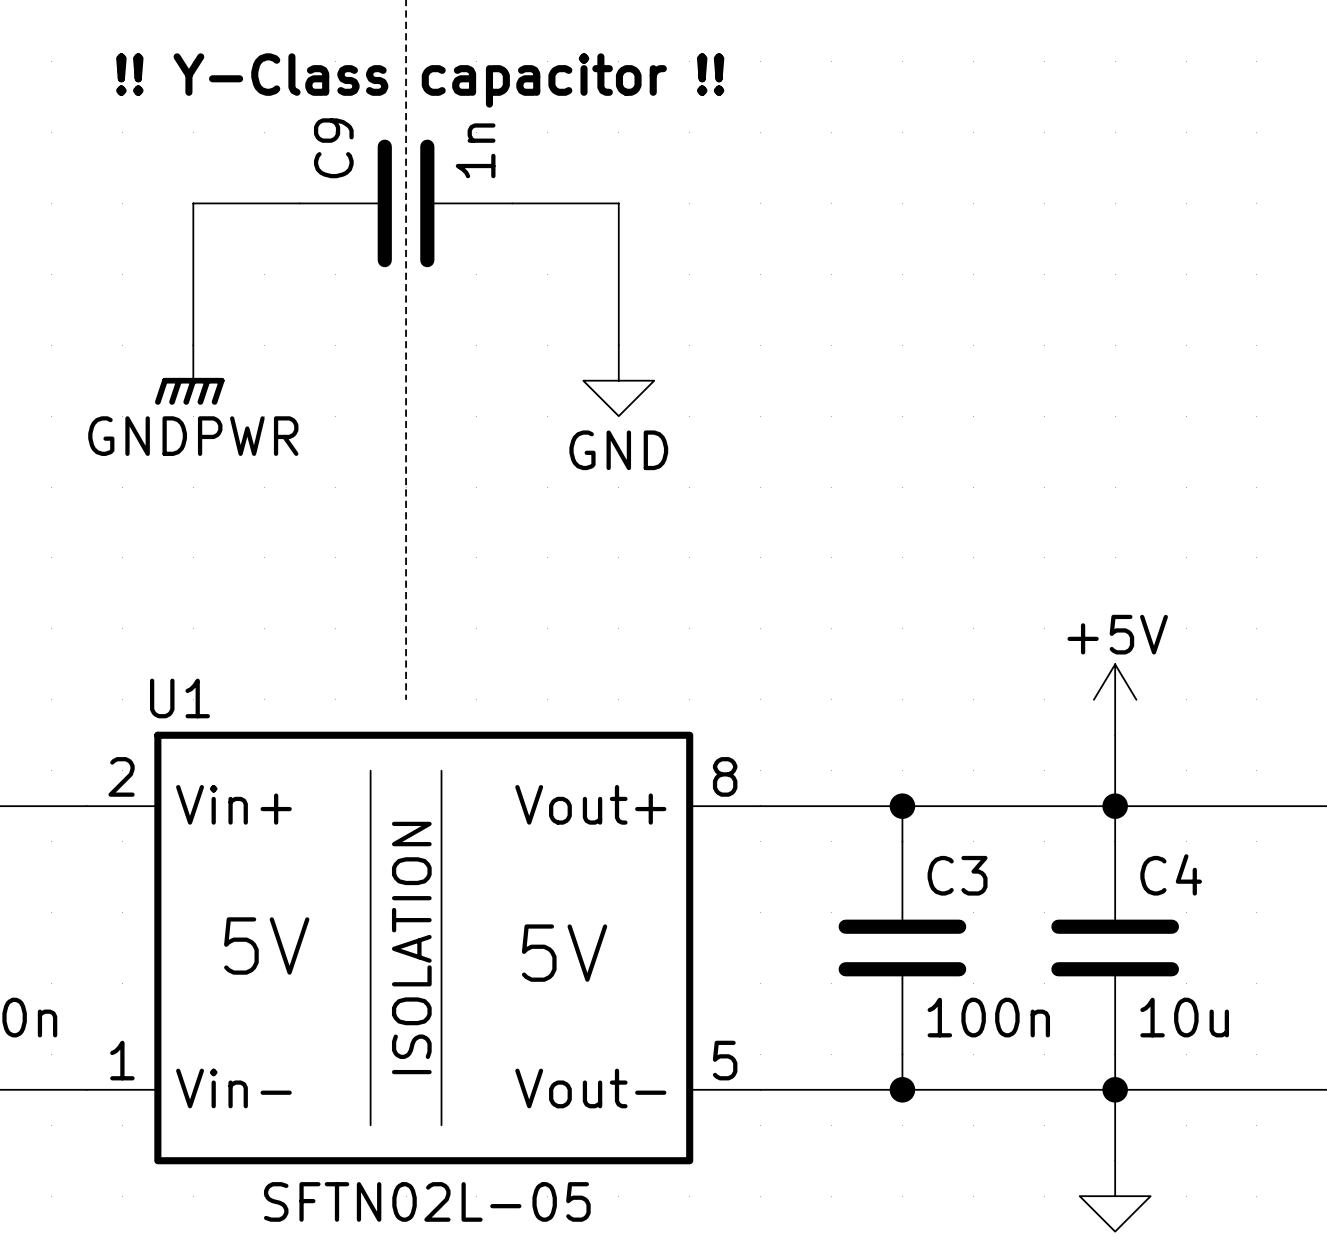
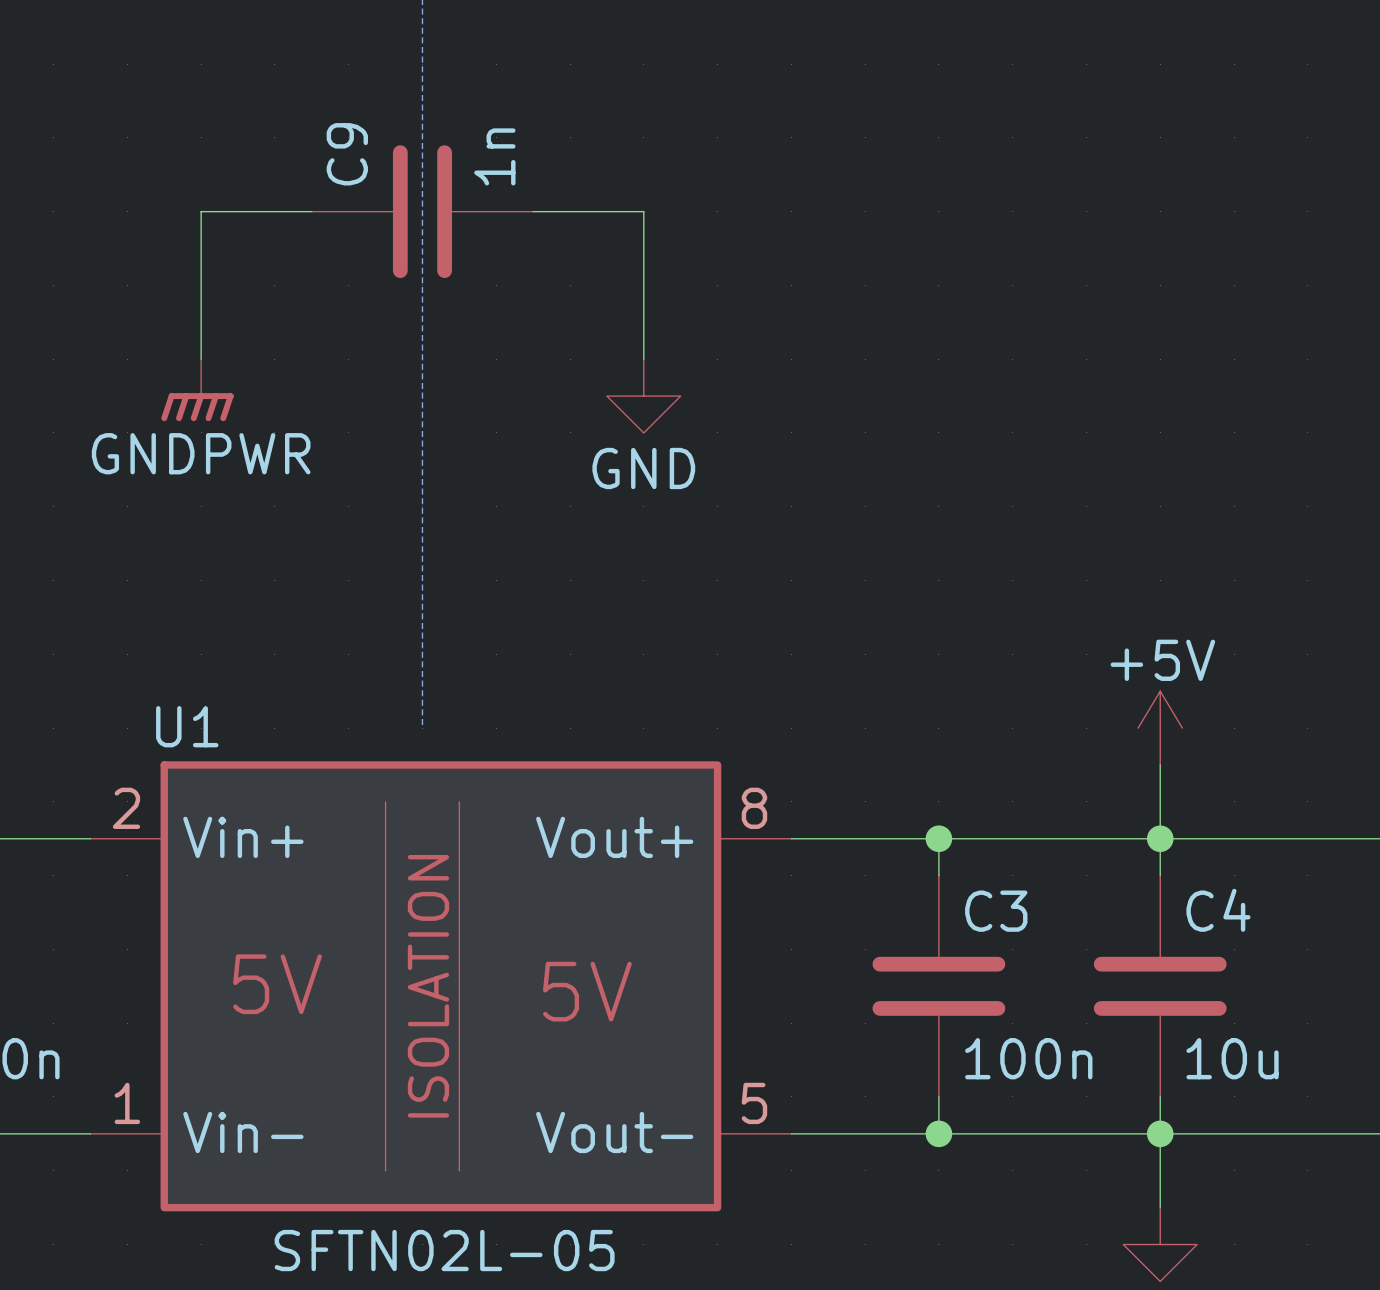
text: !! Y-Class capacitor !! (420, 80) -> none

